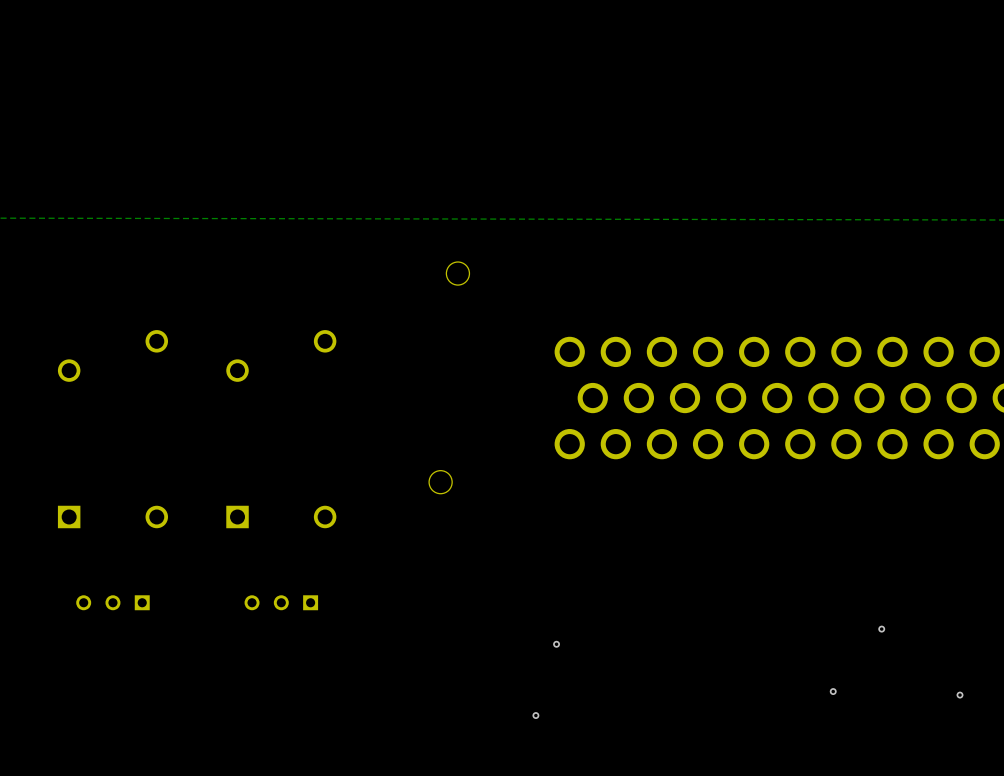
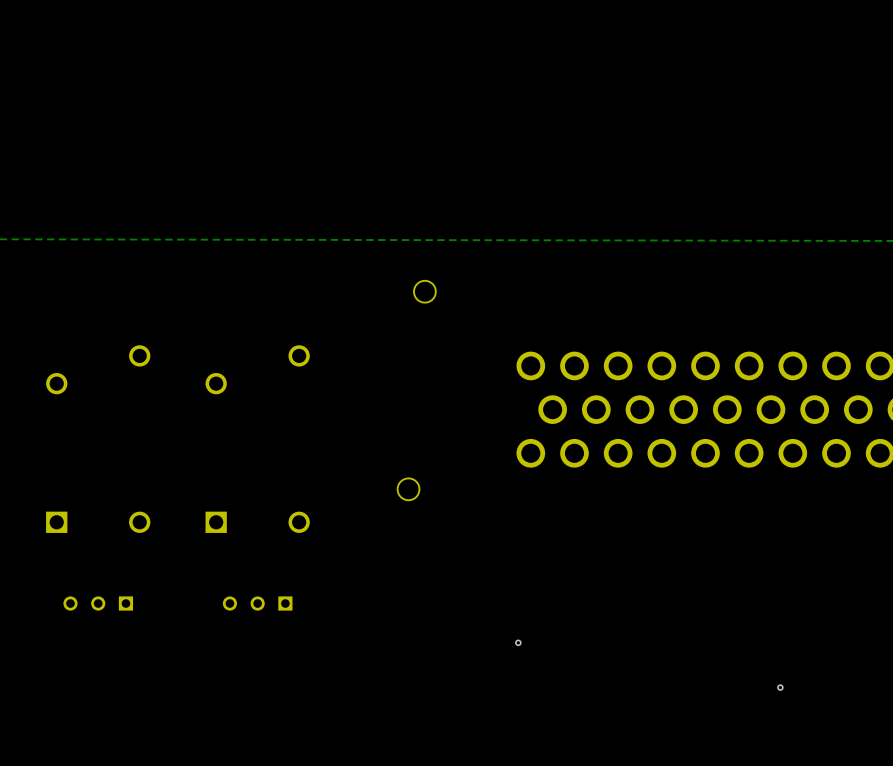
via: (881, 629) -> none
via: (535, 715) -> none

